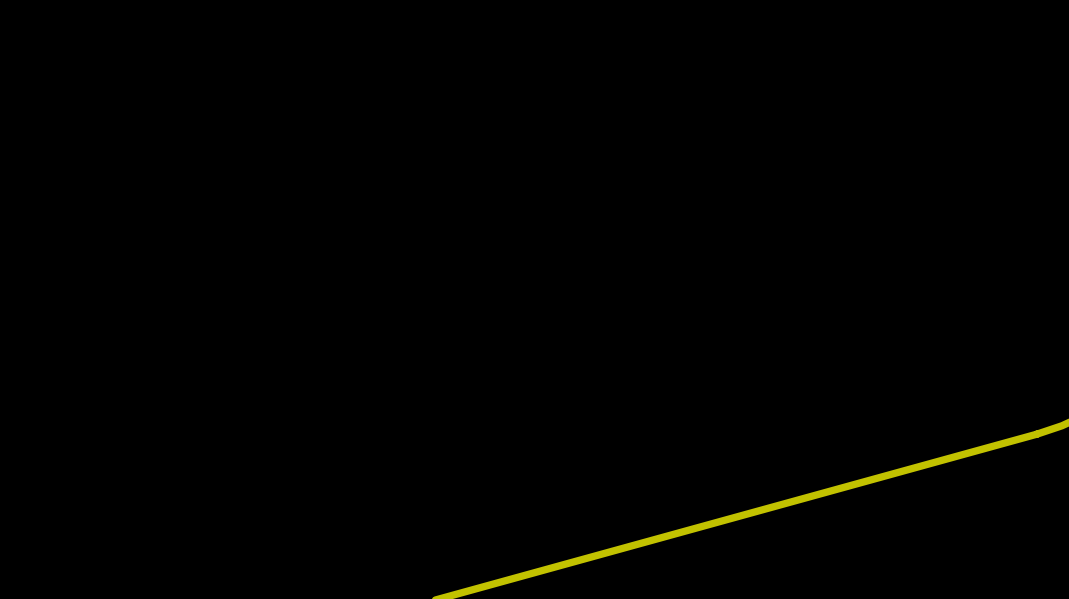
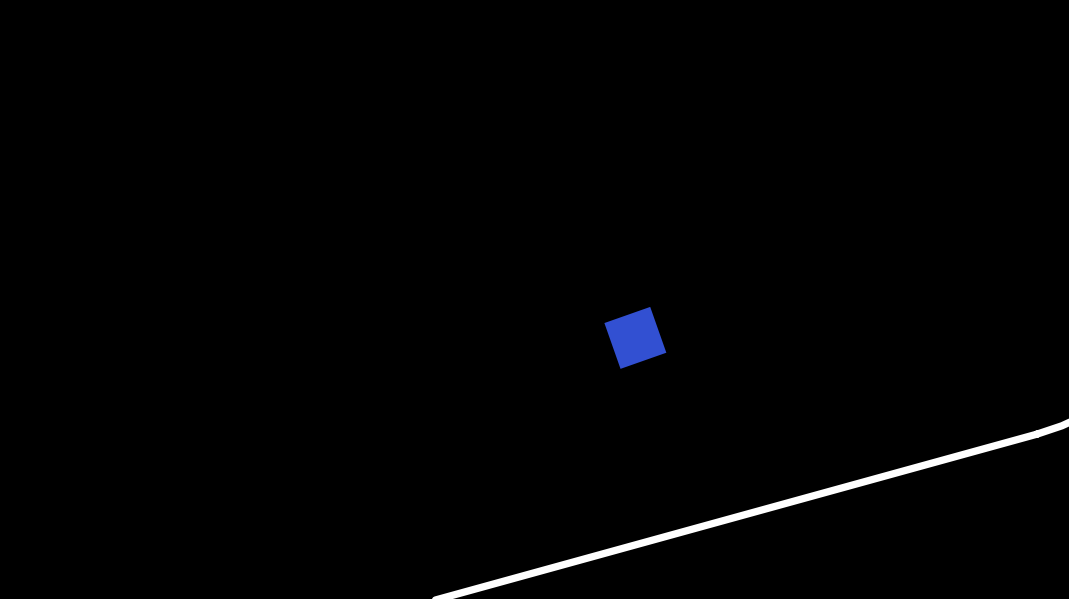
part: none -> (635, 337)

